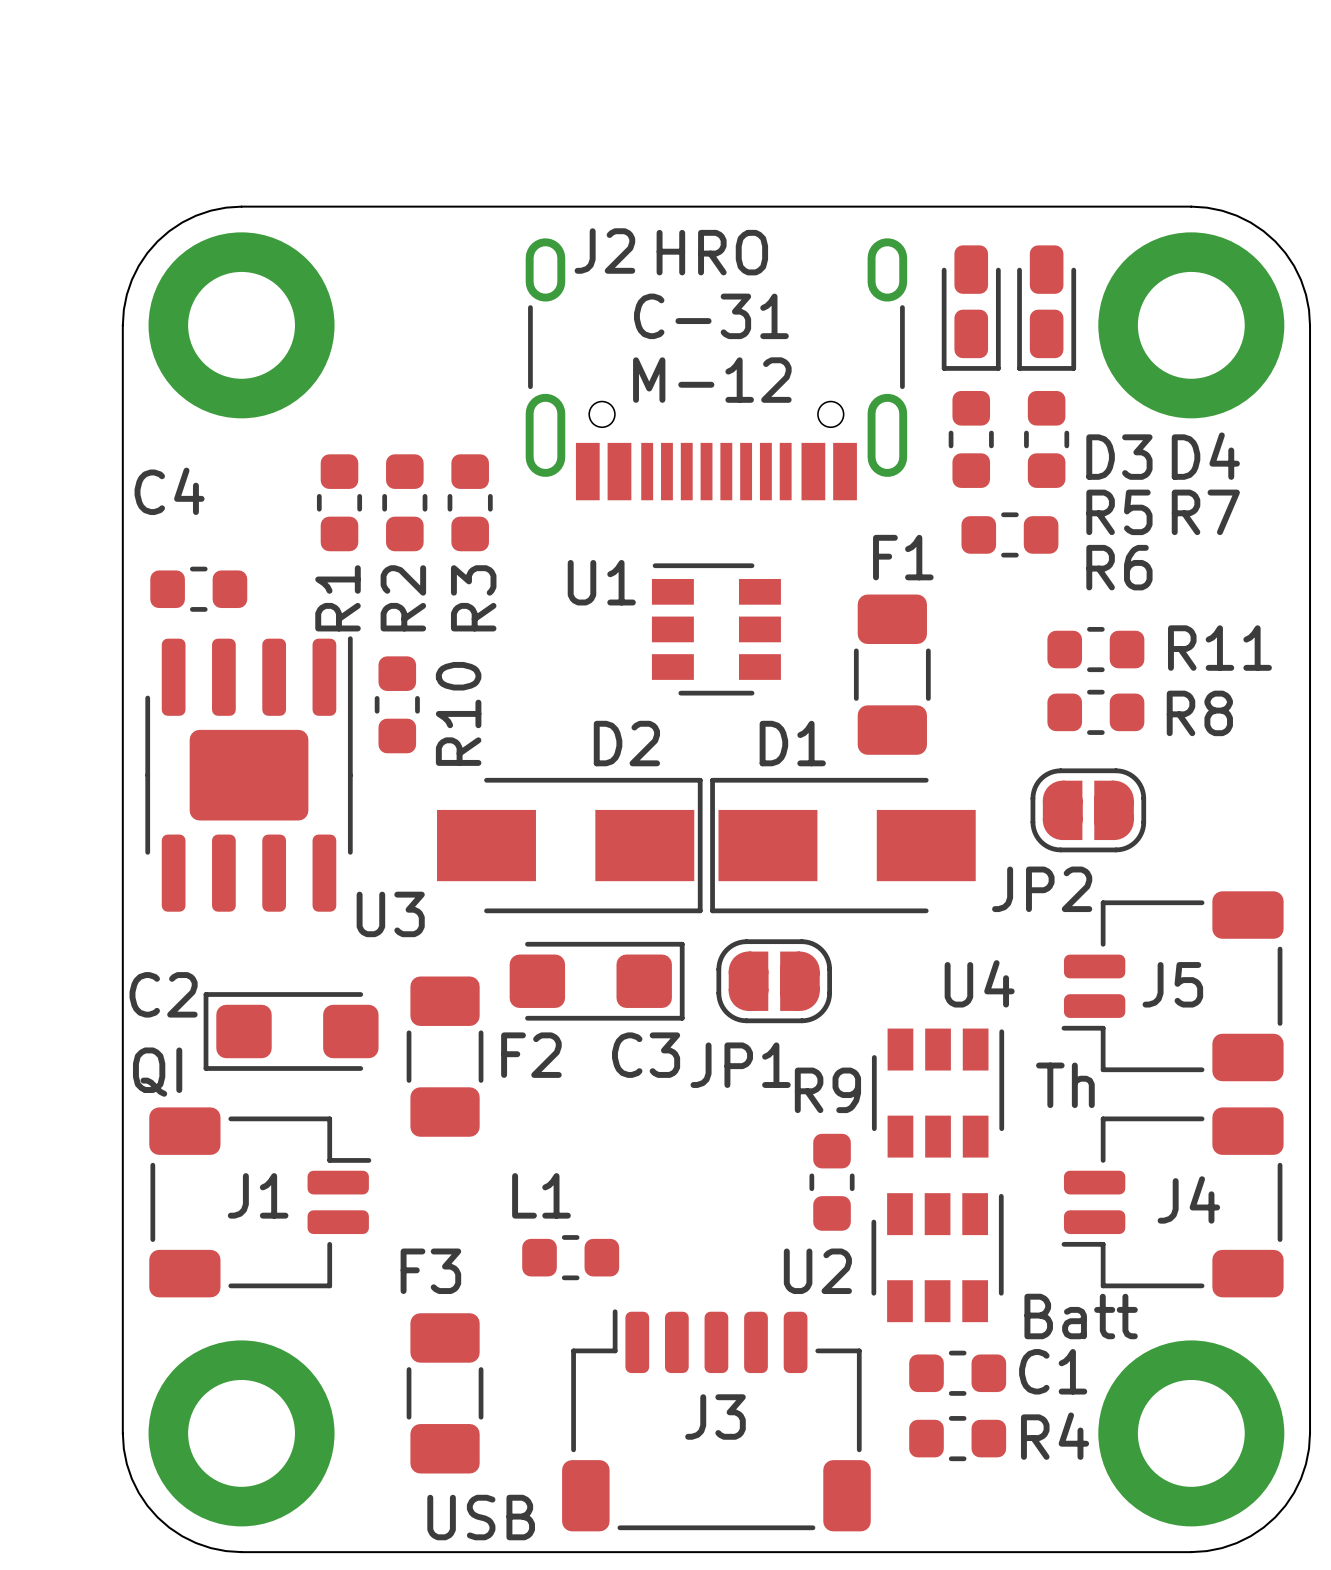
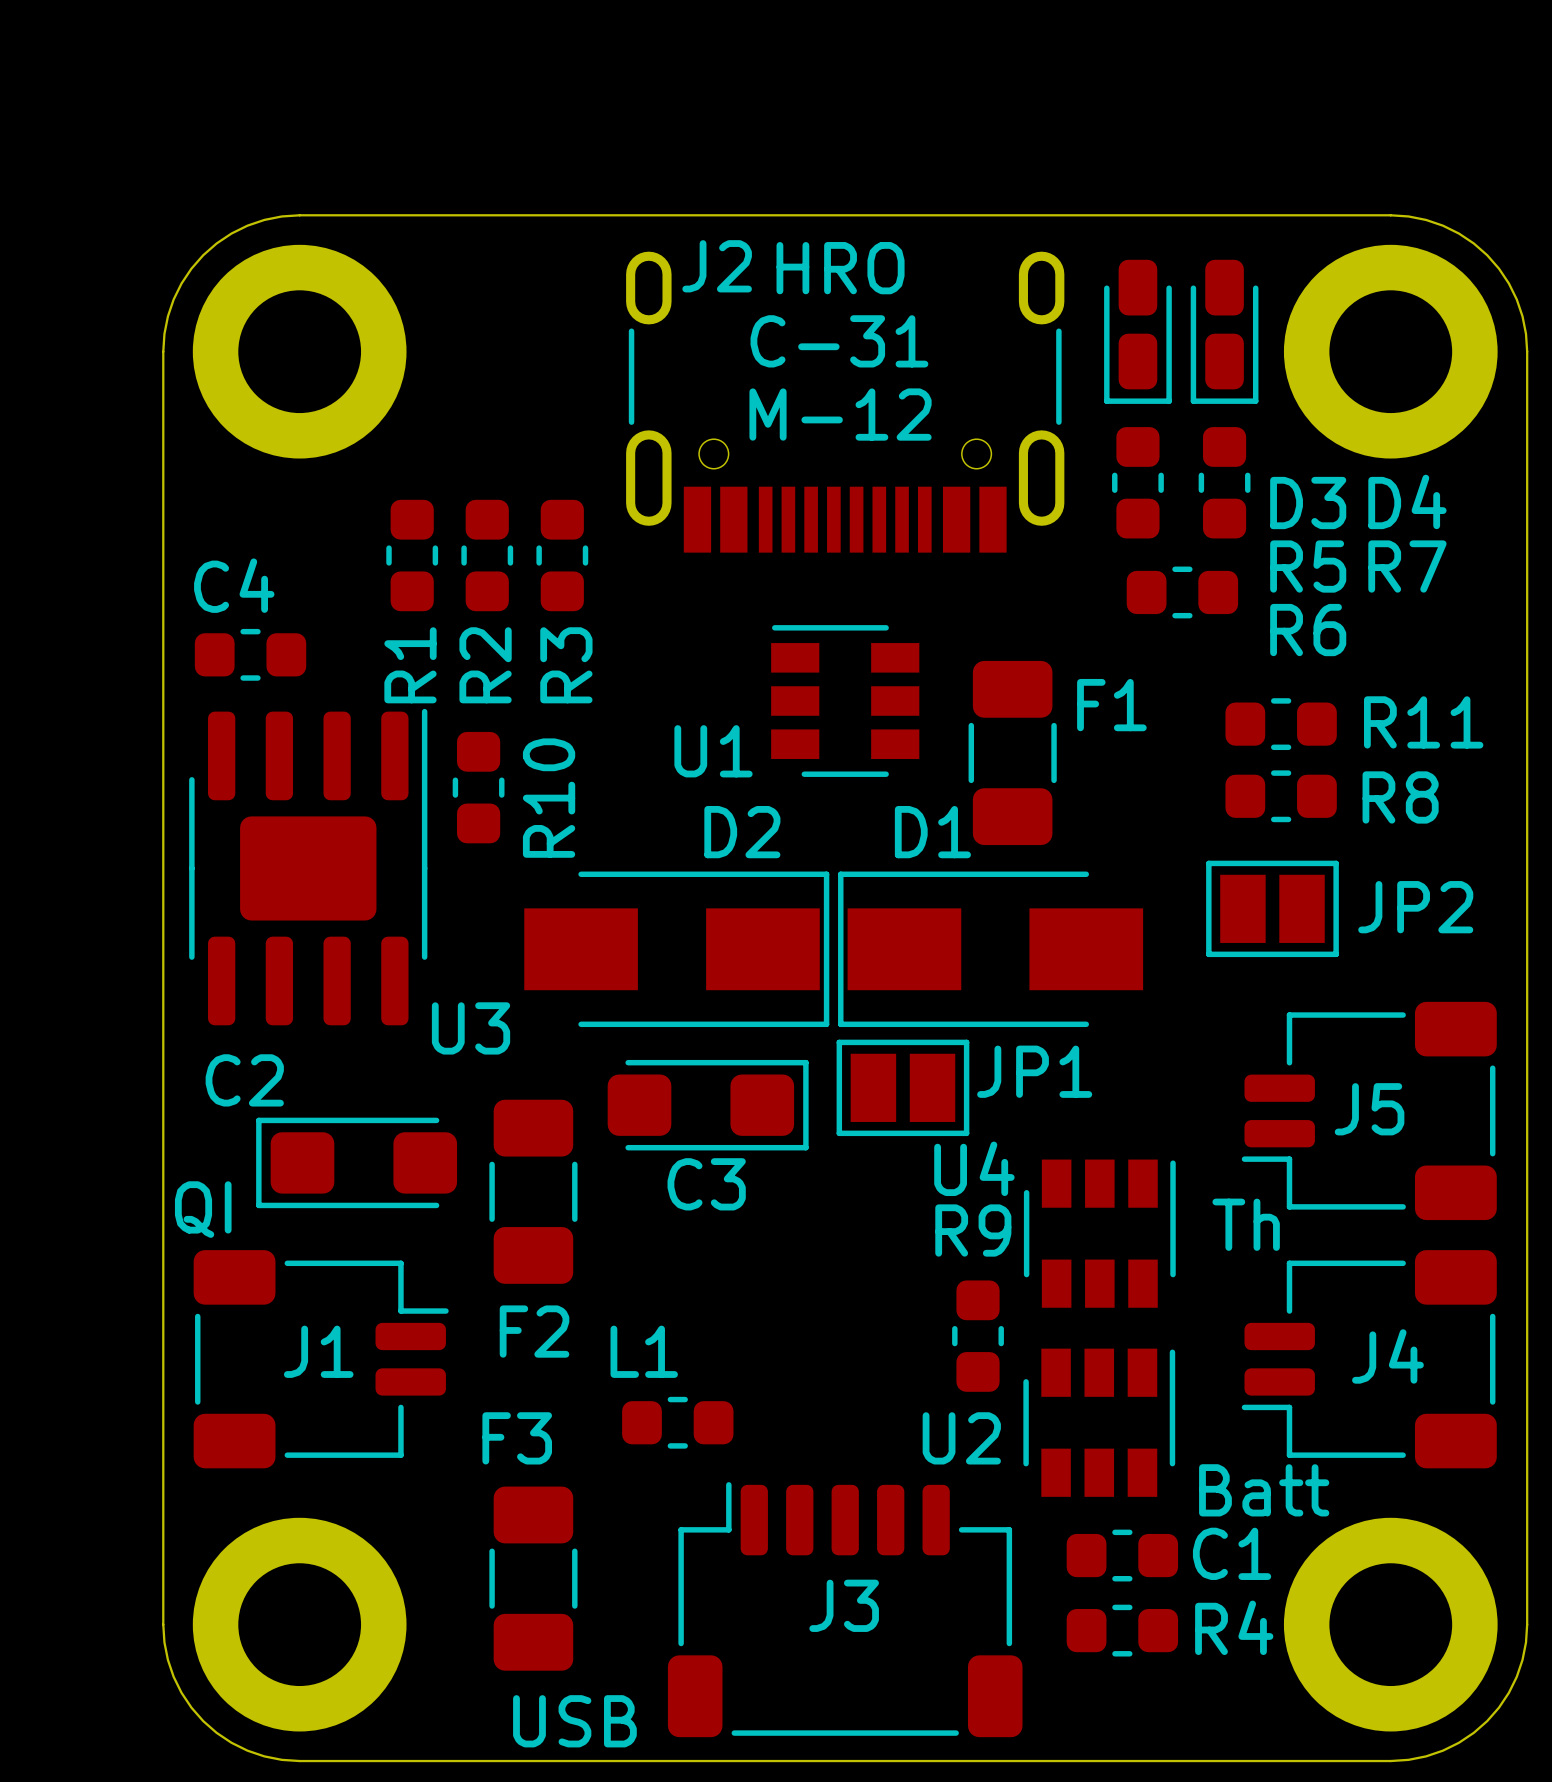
C4 name position: C4 (169, 491) -> C4 (234, 585)
F1 name position: F1 (903, 557) -> F1 (1111, 705)
U1 name position: U1 (601, 582) -> U1 (713, 751)
F1 position: (892, 674) -> (1012, 752)
JP2 footprint: [1030, 768, 1147, 853] -> [1206, 860, 1339, 958]
JP2 name position: JP2 (1042, 889) -> JP2 (1415, 907)
JP1 footprint: [716, 939, 833, 1024] -> [836, 1039, 970, 1137]
U4 name position: U4 (979, 983) -> U4 (974, 1168)
C2 name position: C2 (163, 994) -> C2 (244, 1080)
F2 name position: F2 (531, 1055) -> F2 (534, 1331)
C3 name position: C3 (646, 1055) -> C3 (706, 1184)
JP1 name position: JP1 (740, 1065) -> JP1 (1034, 1071)

